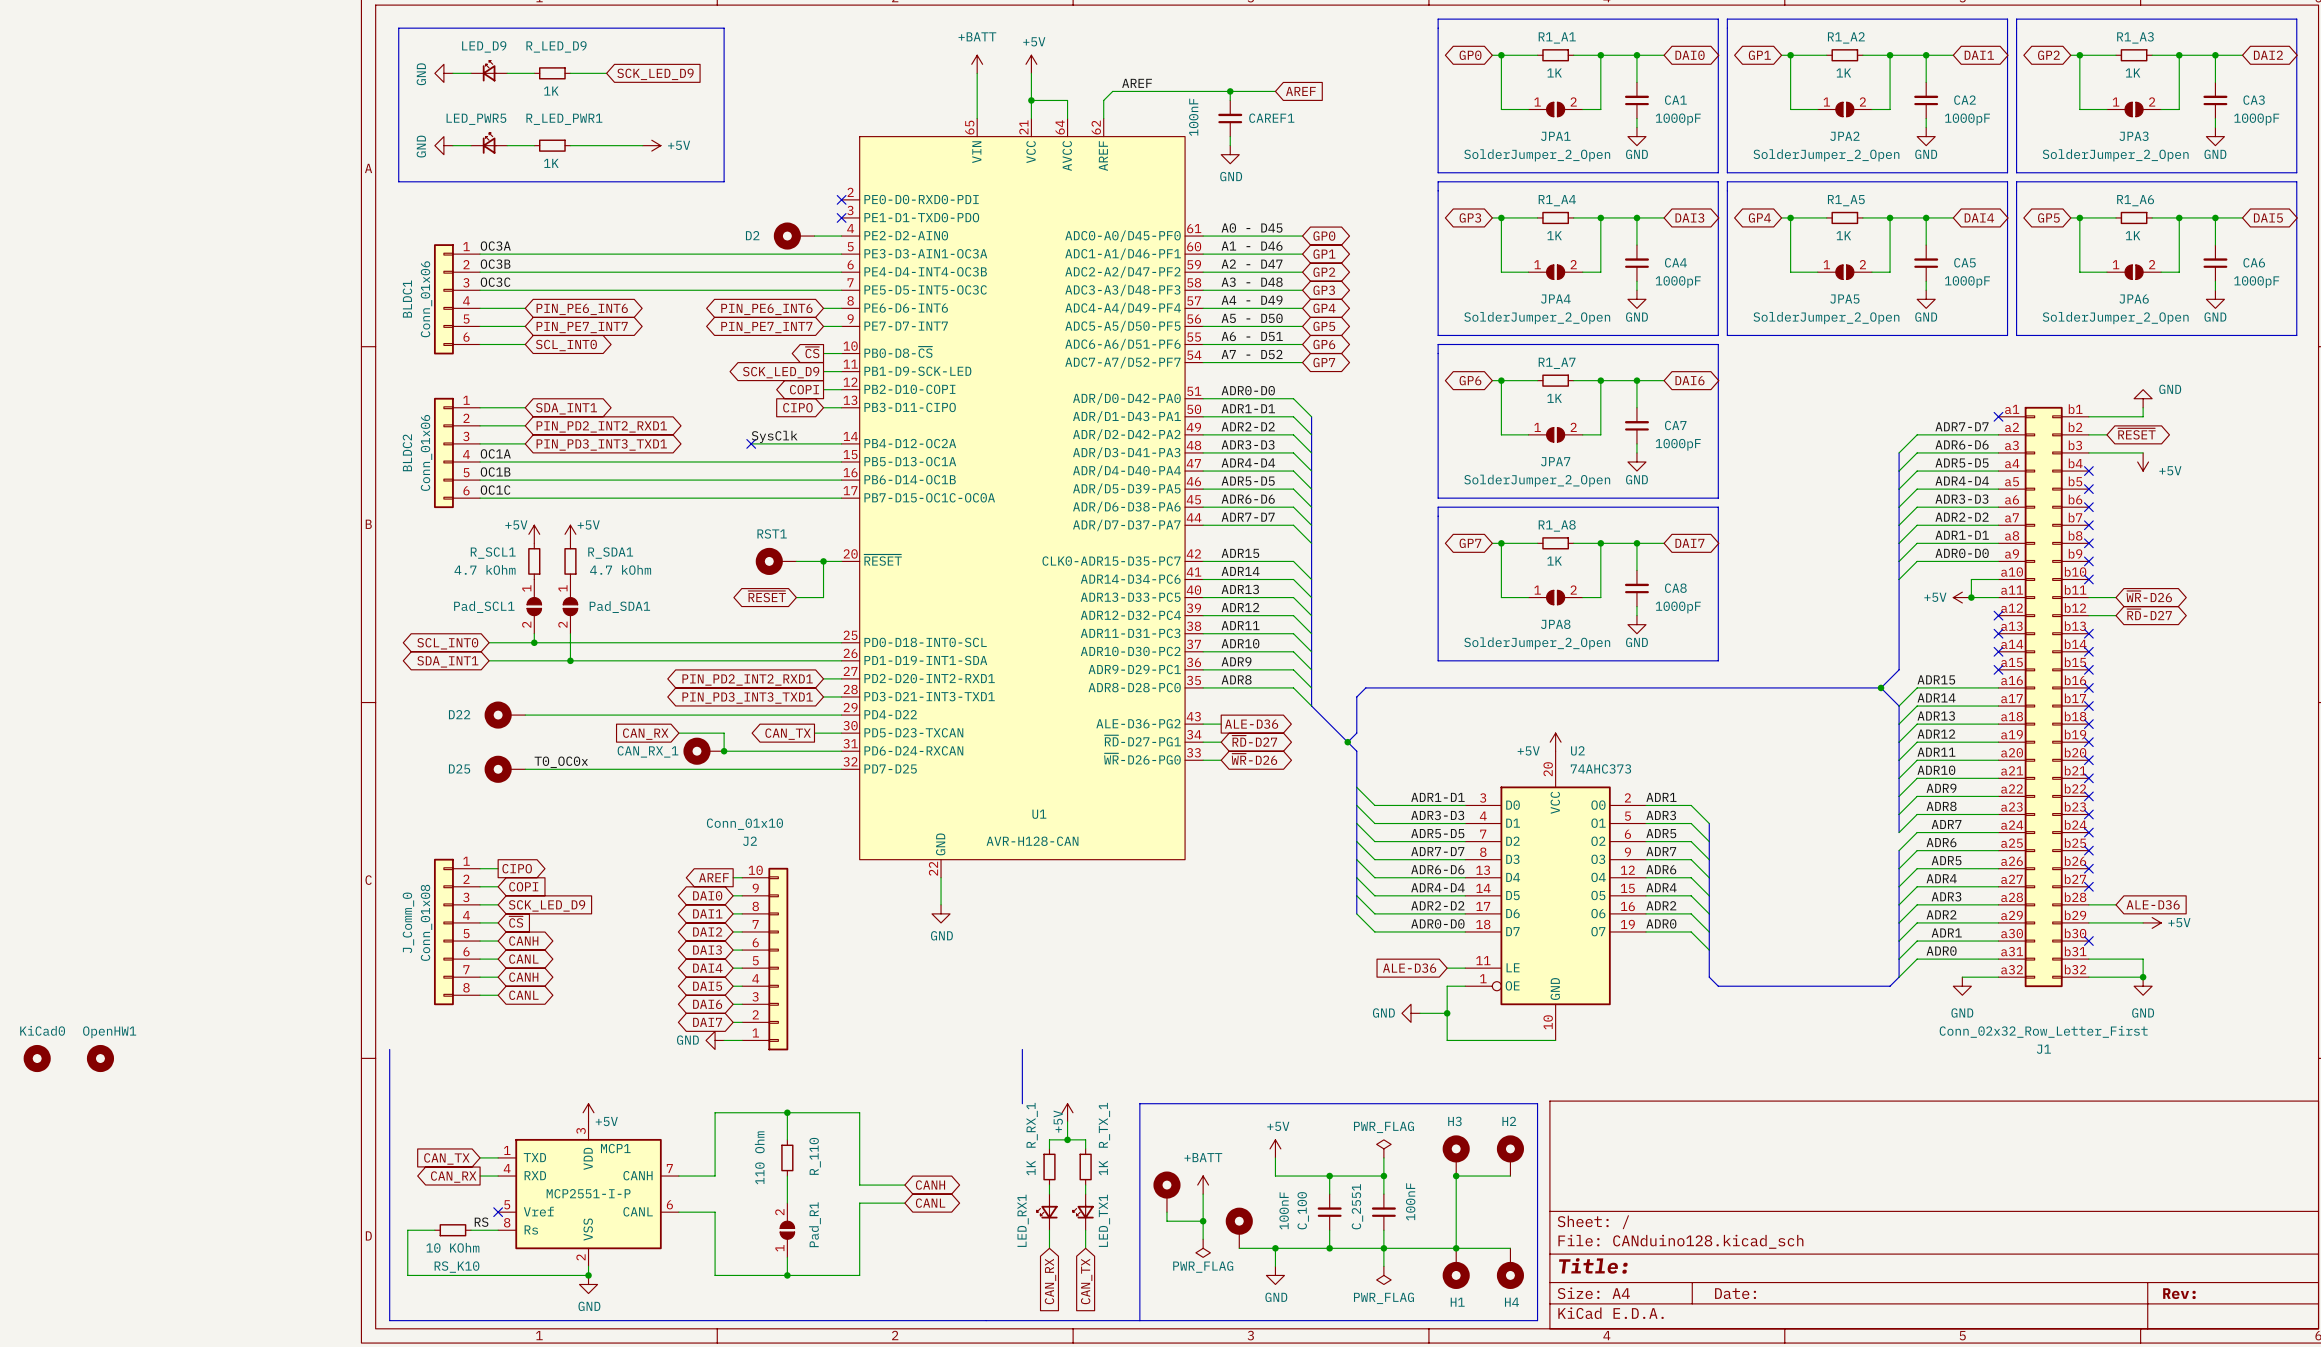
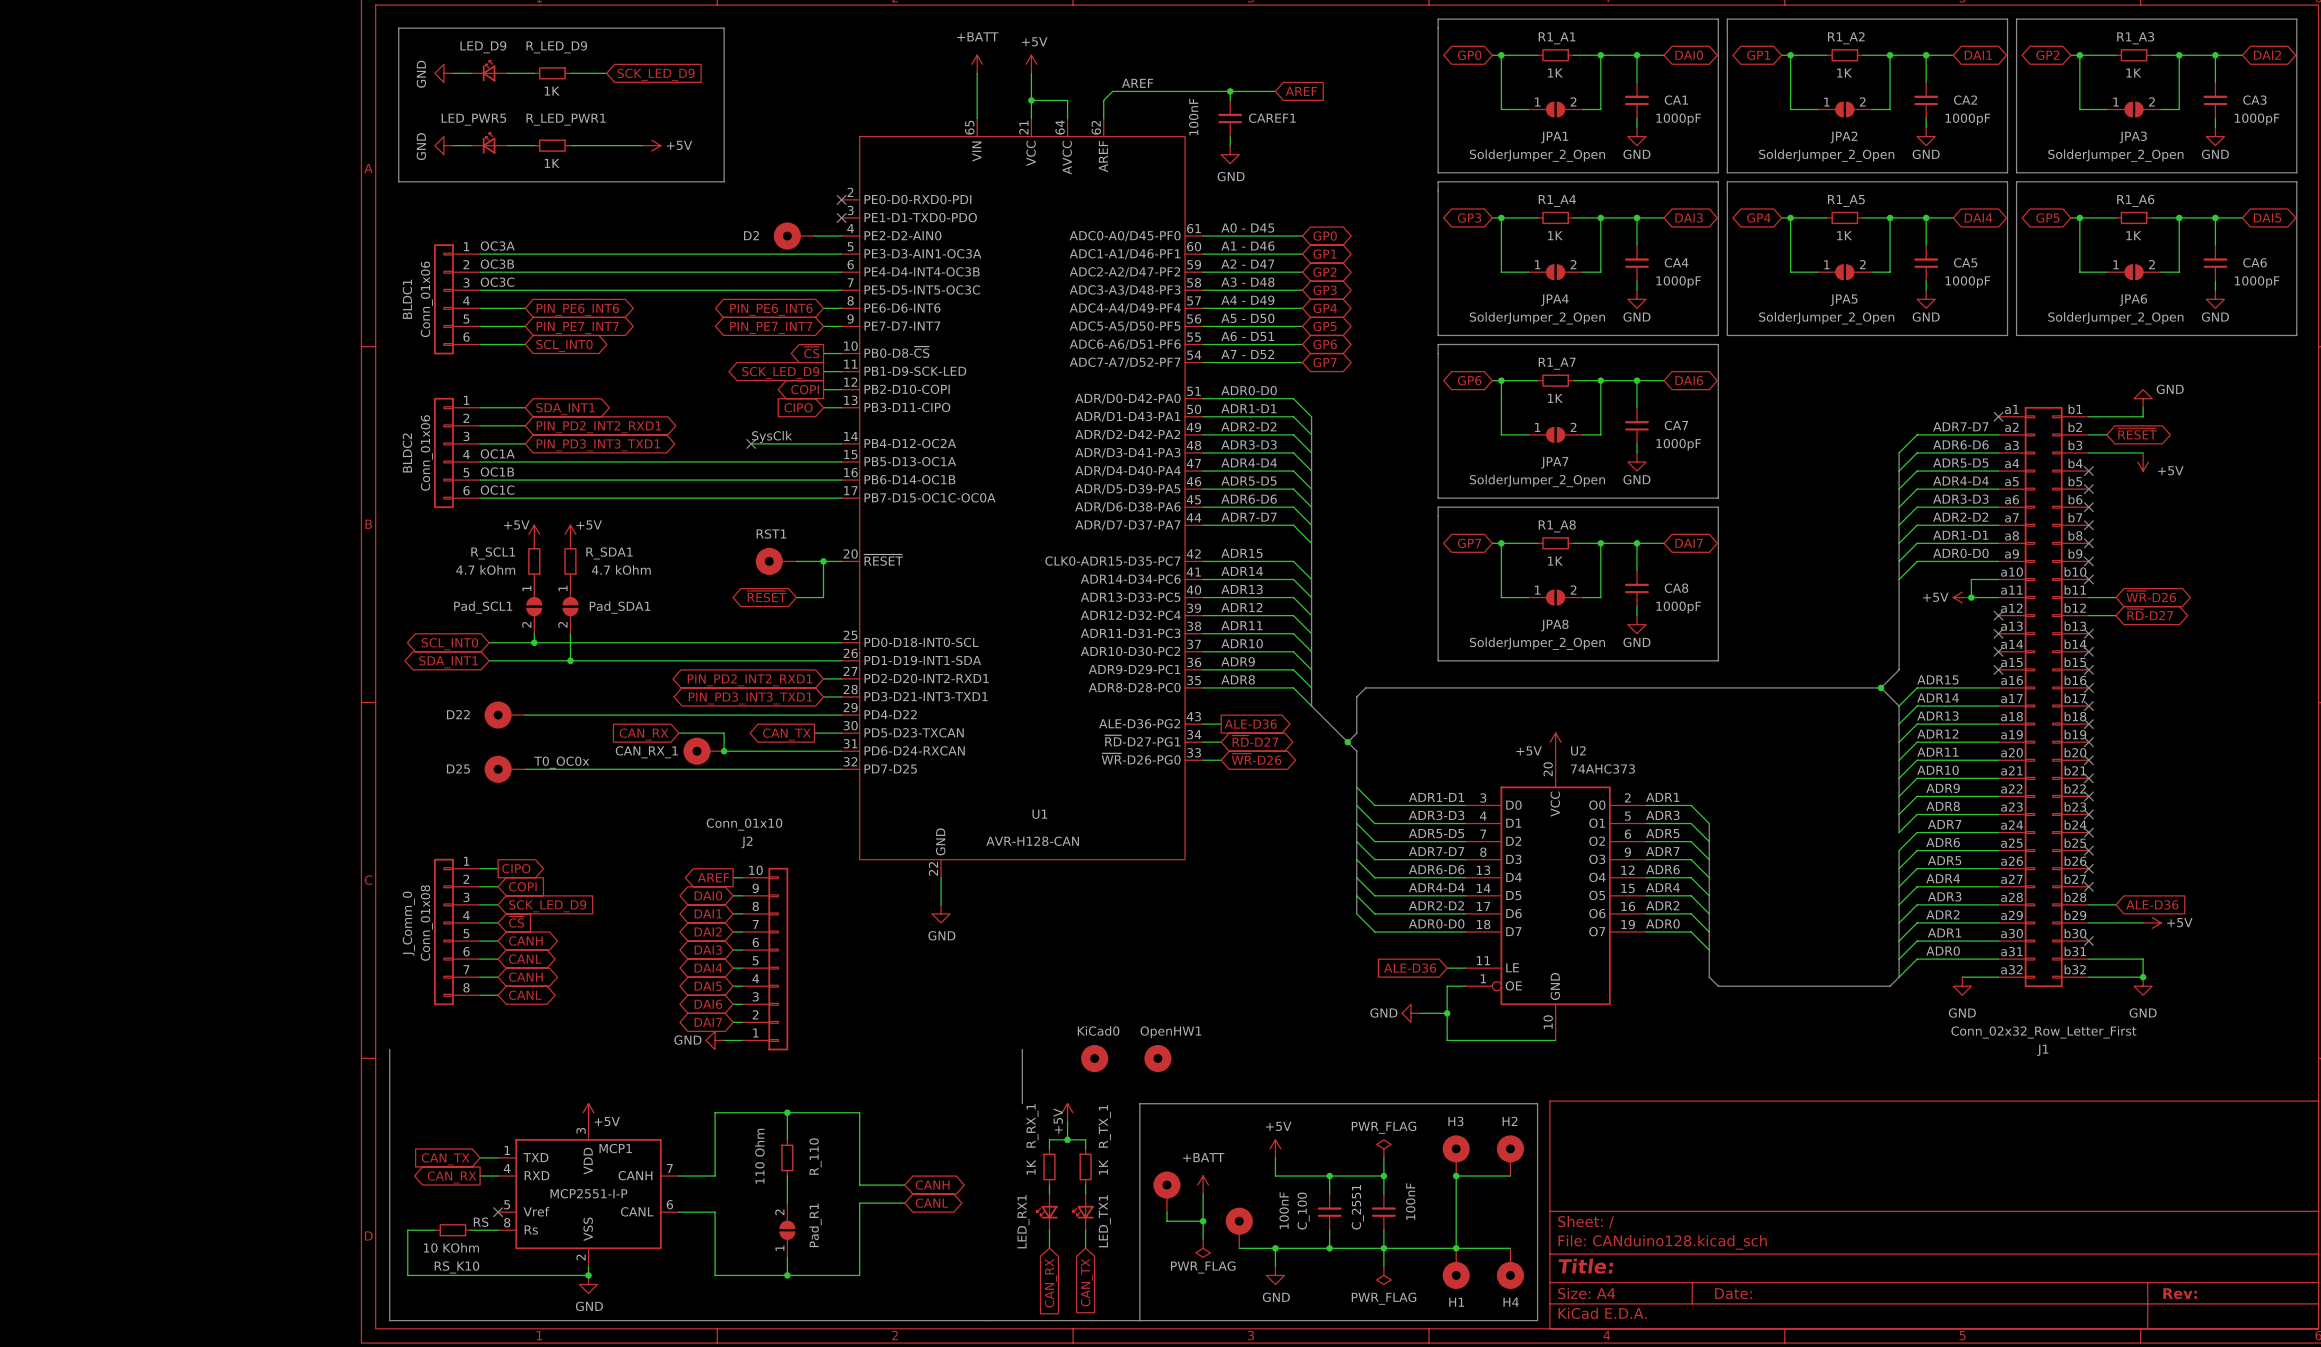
KiCad0 position: (37, 1058) -> (1094, 1058)
OpenHW1 position: (100, 1058) -> (1157, 1058)

